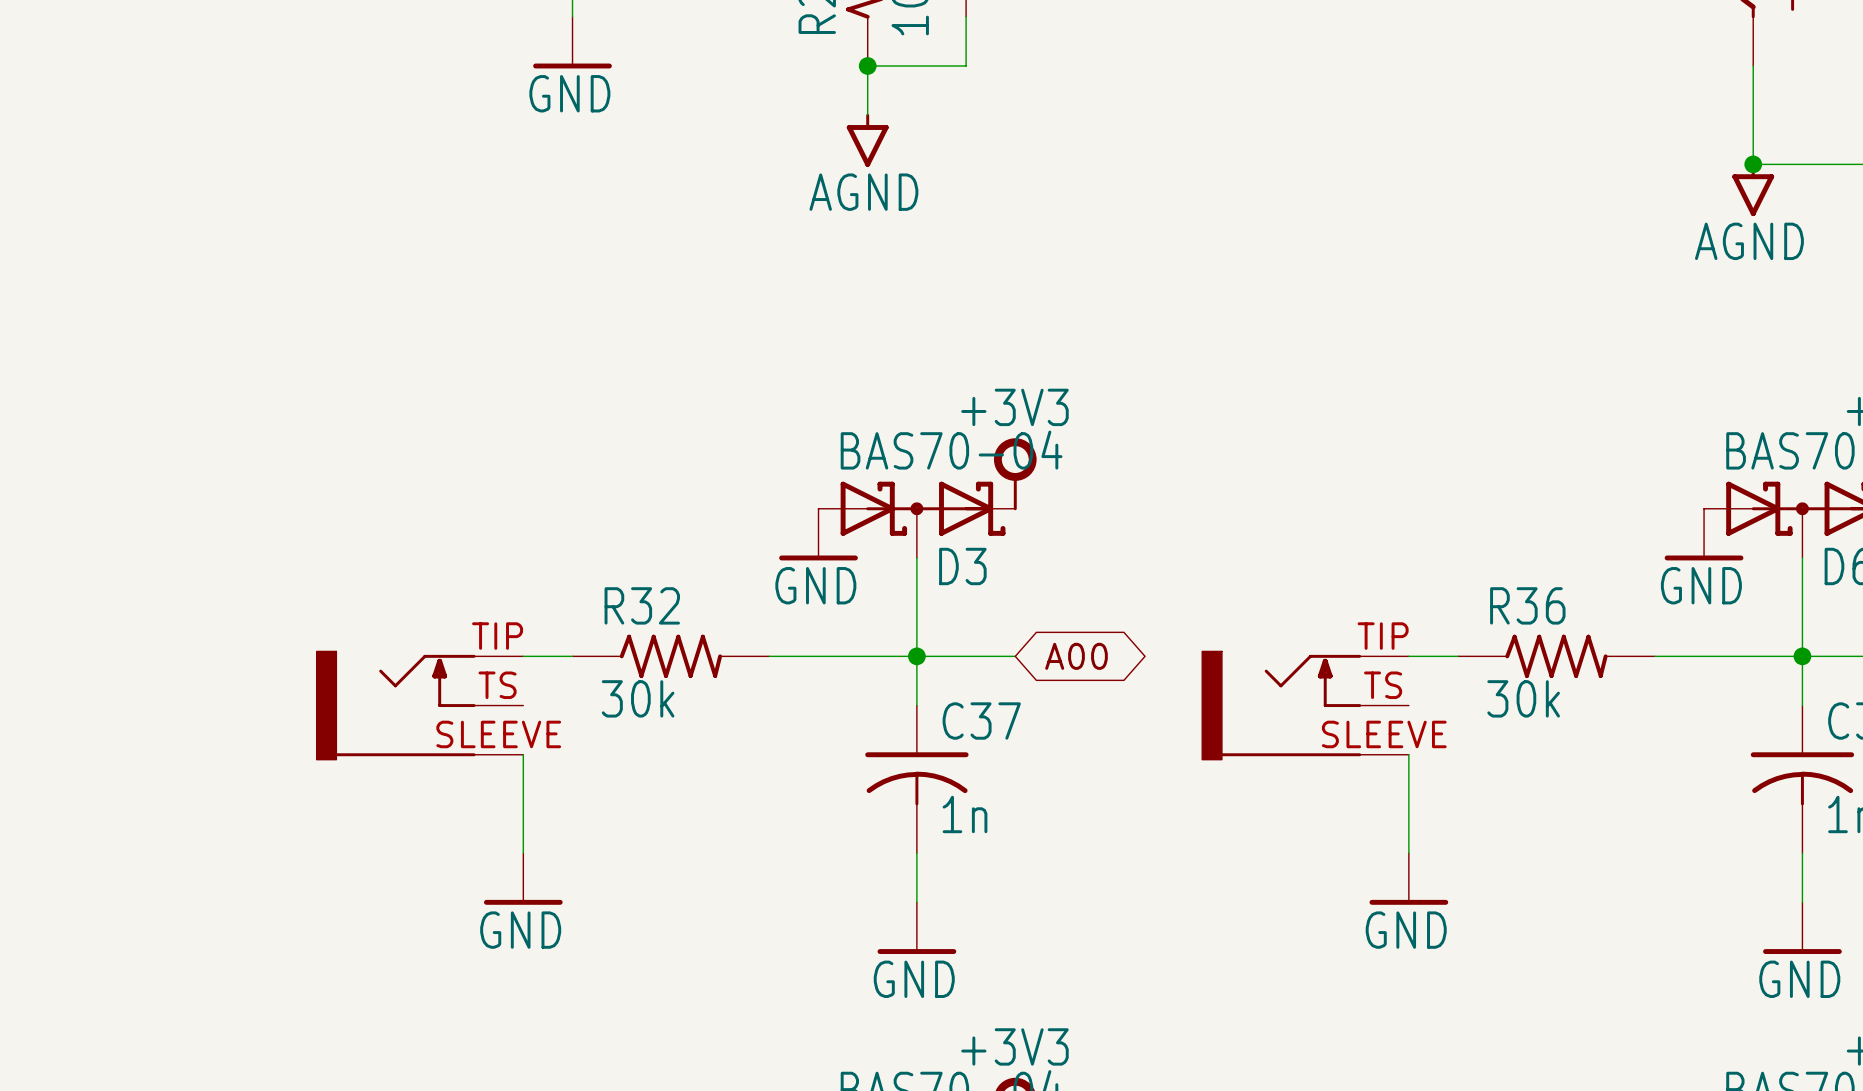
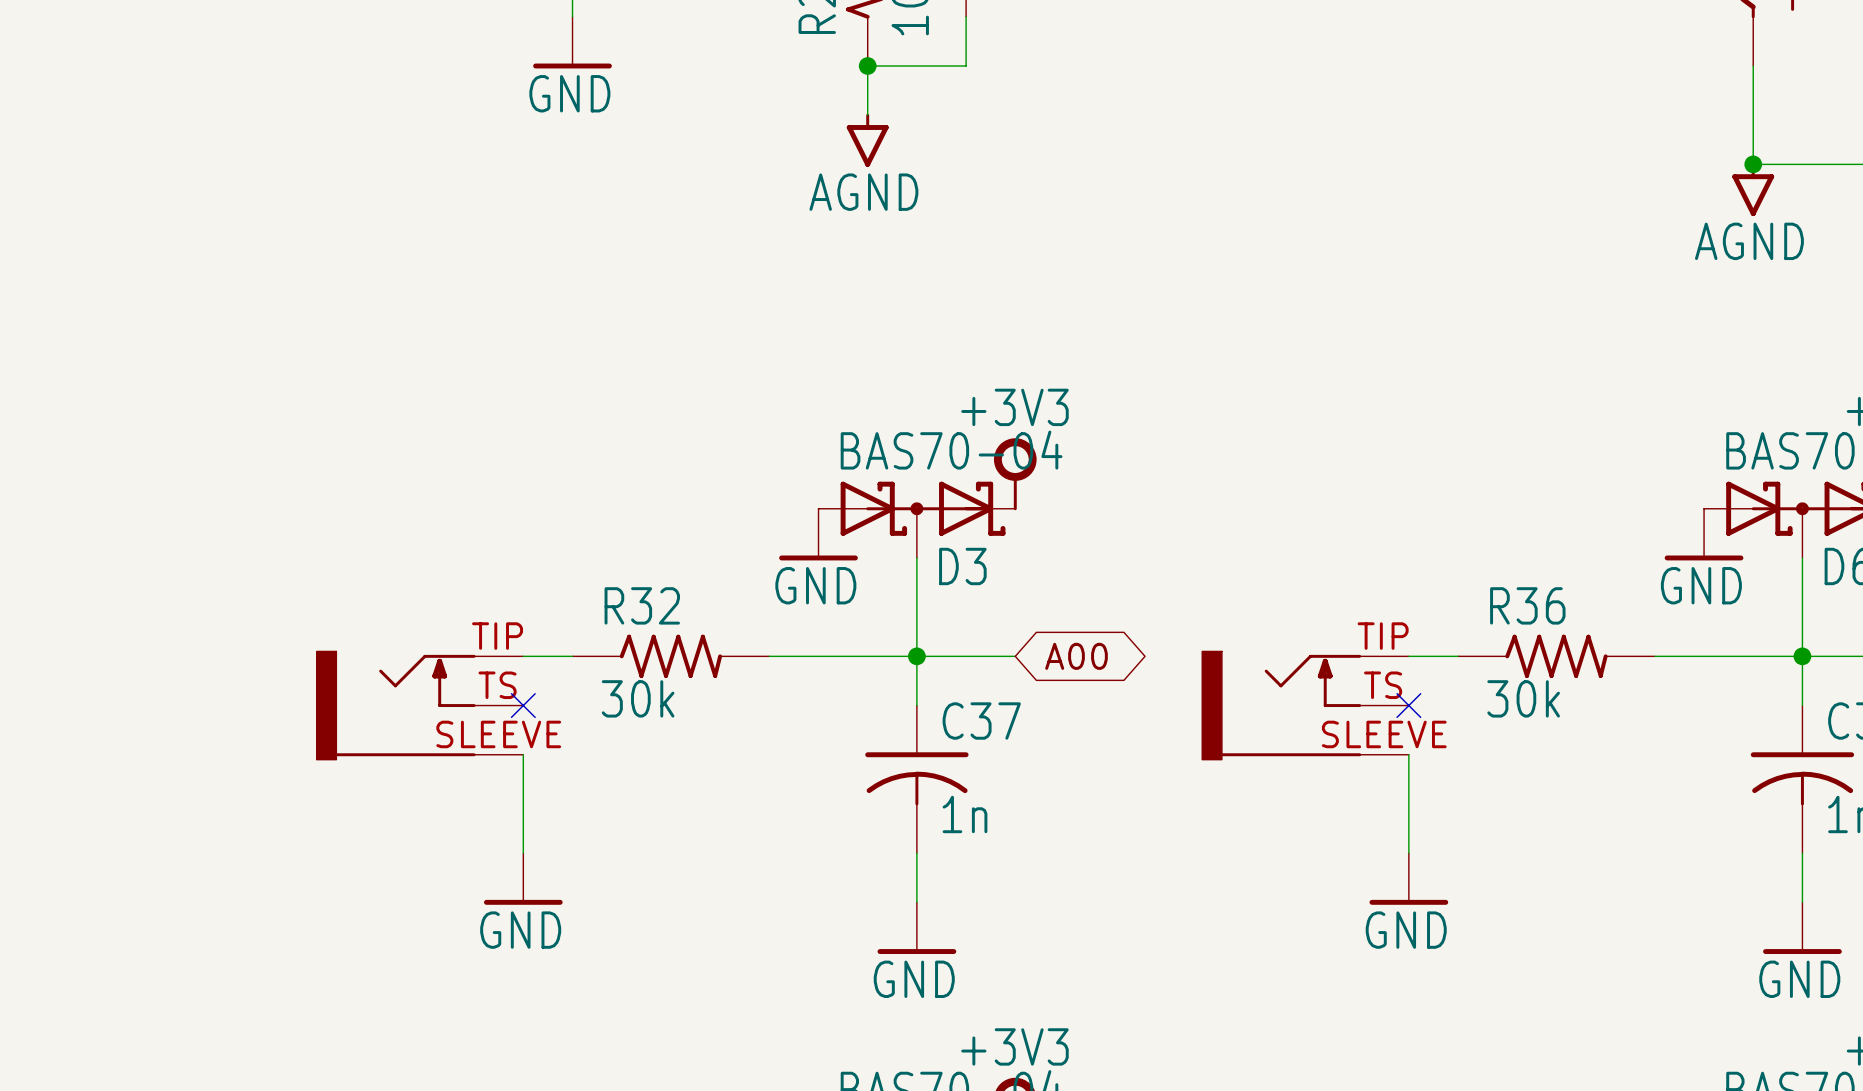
no-connect mark: none -> (523, 705)
no-connect mark: none -> (1408, 705)

